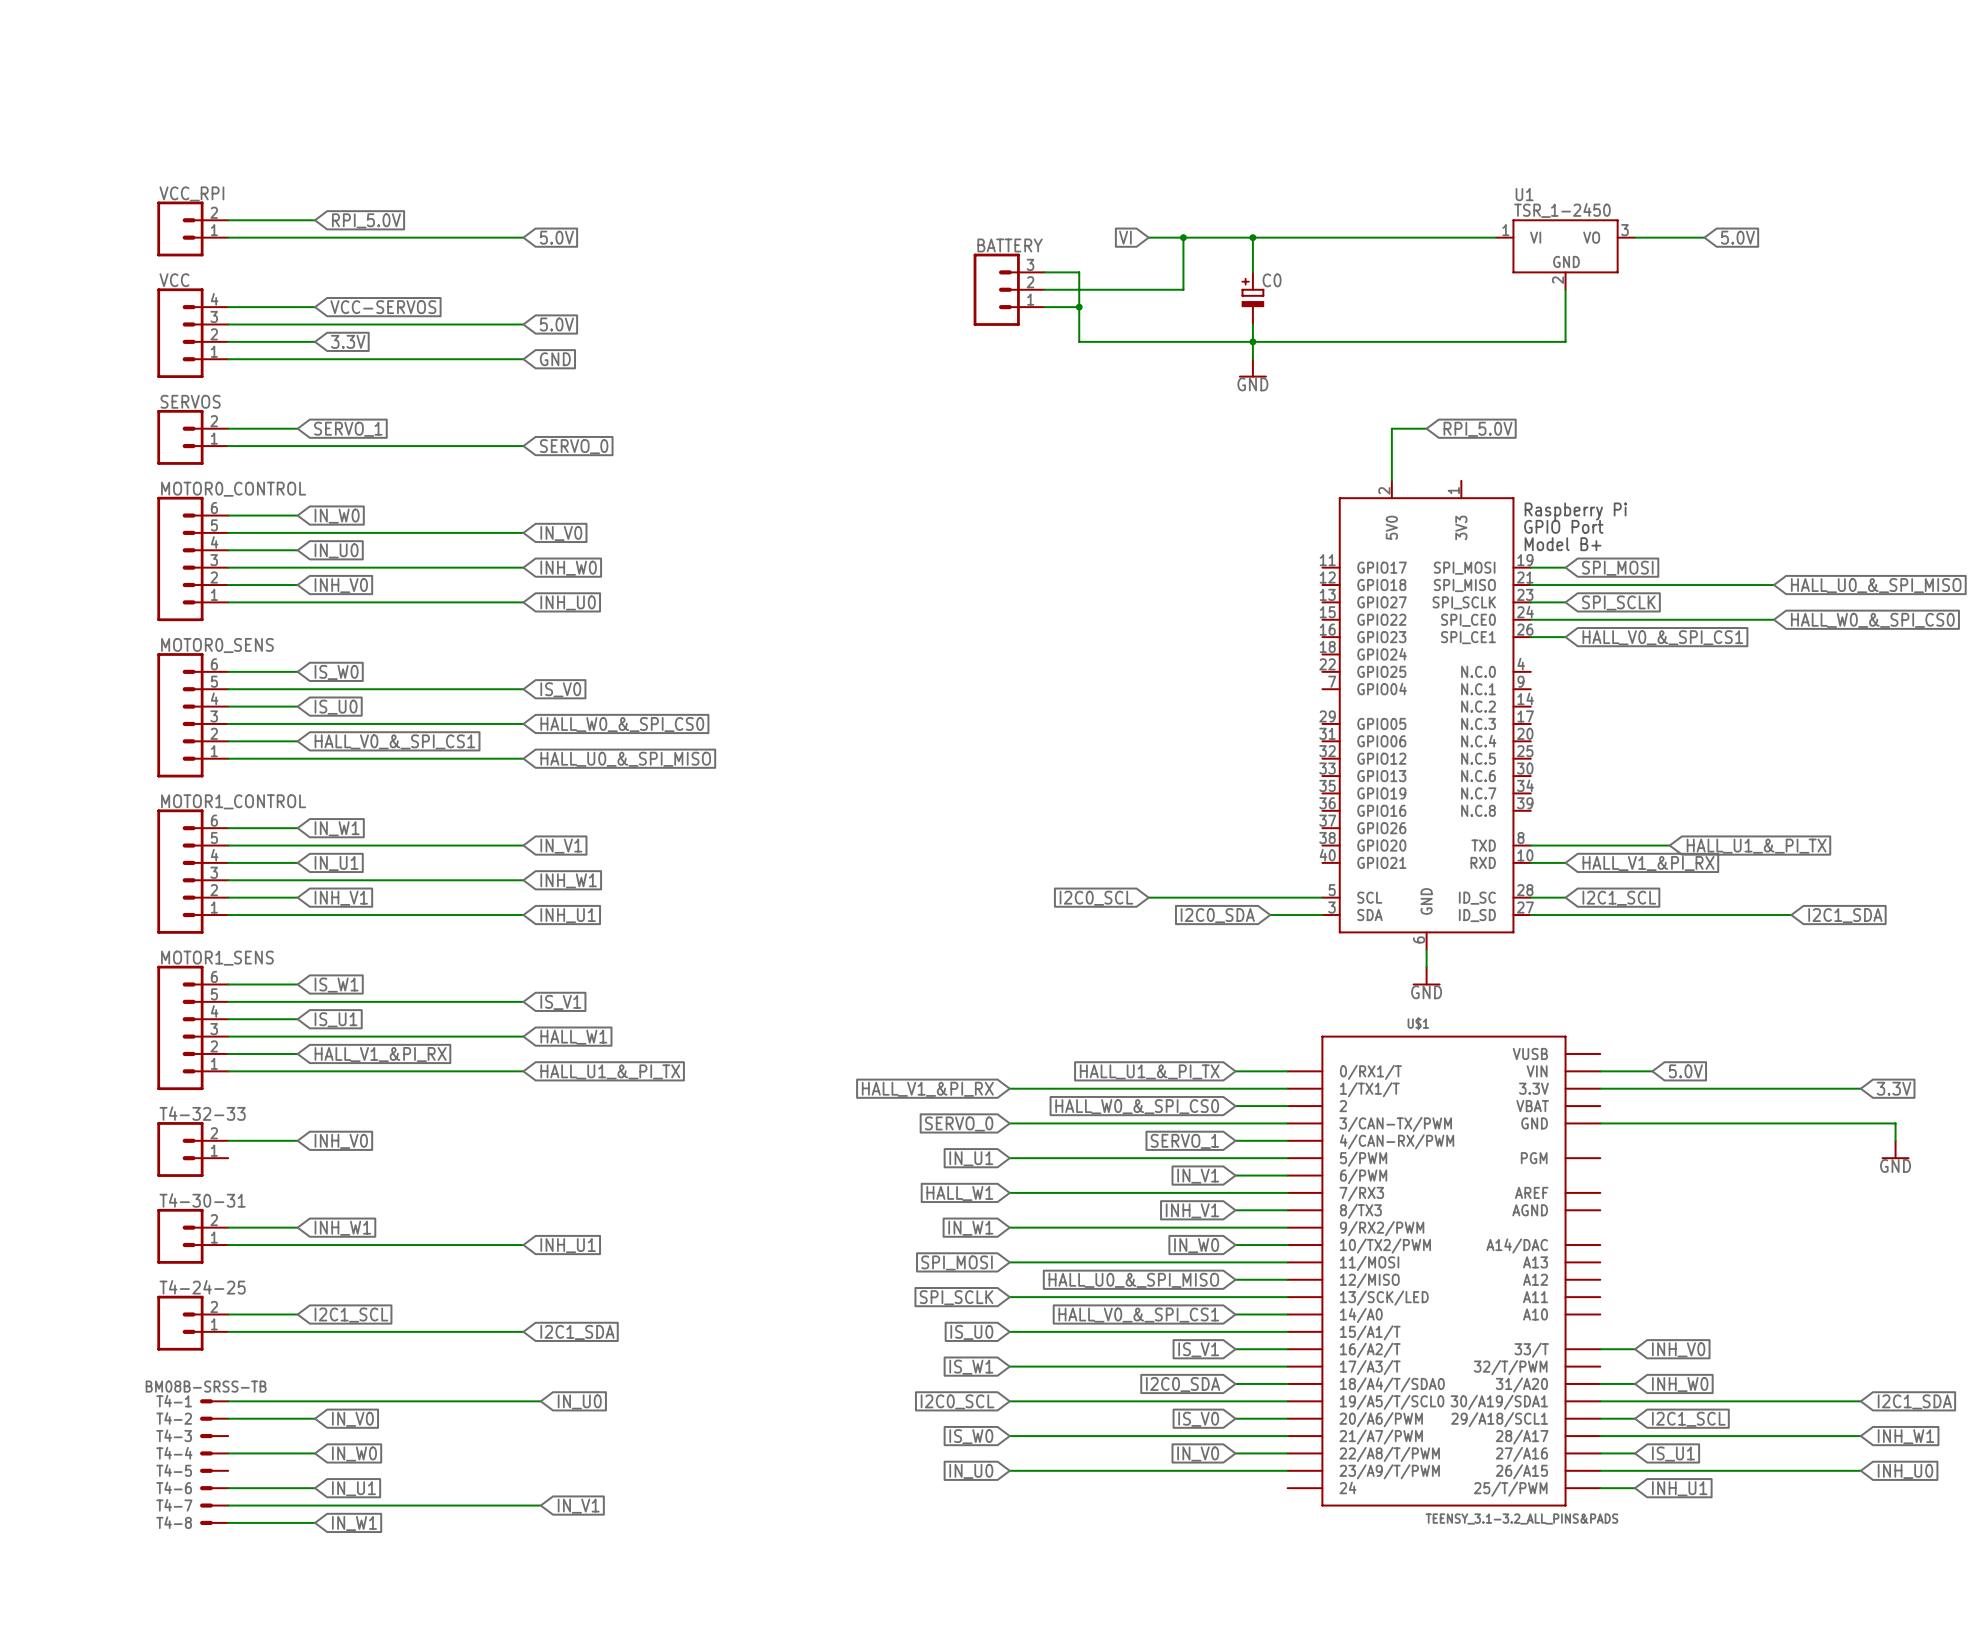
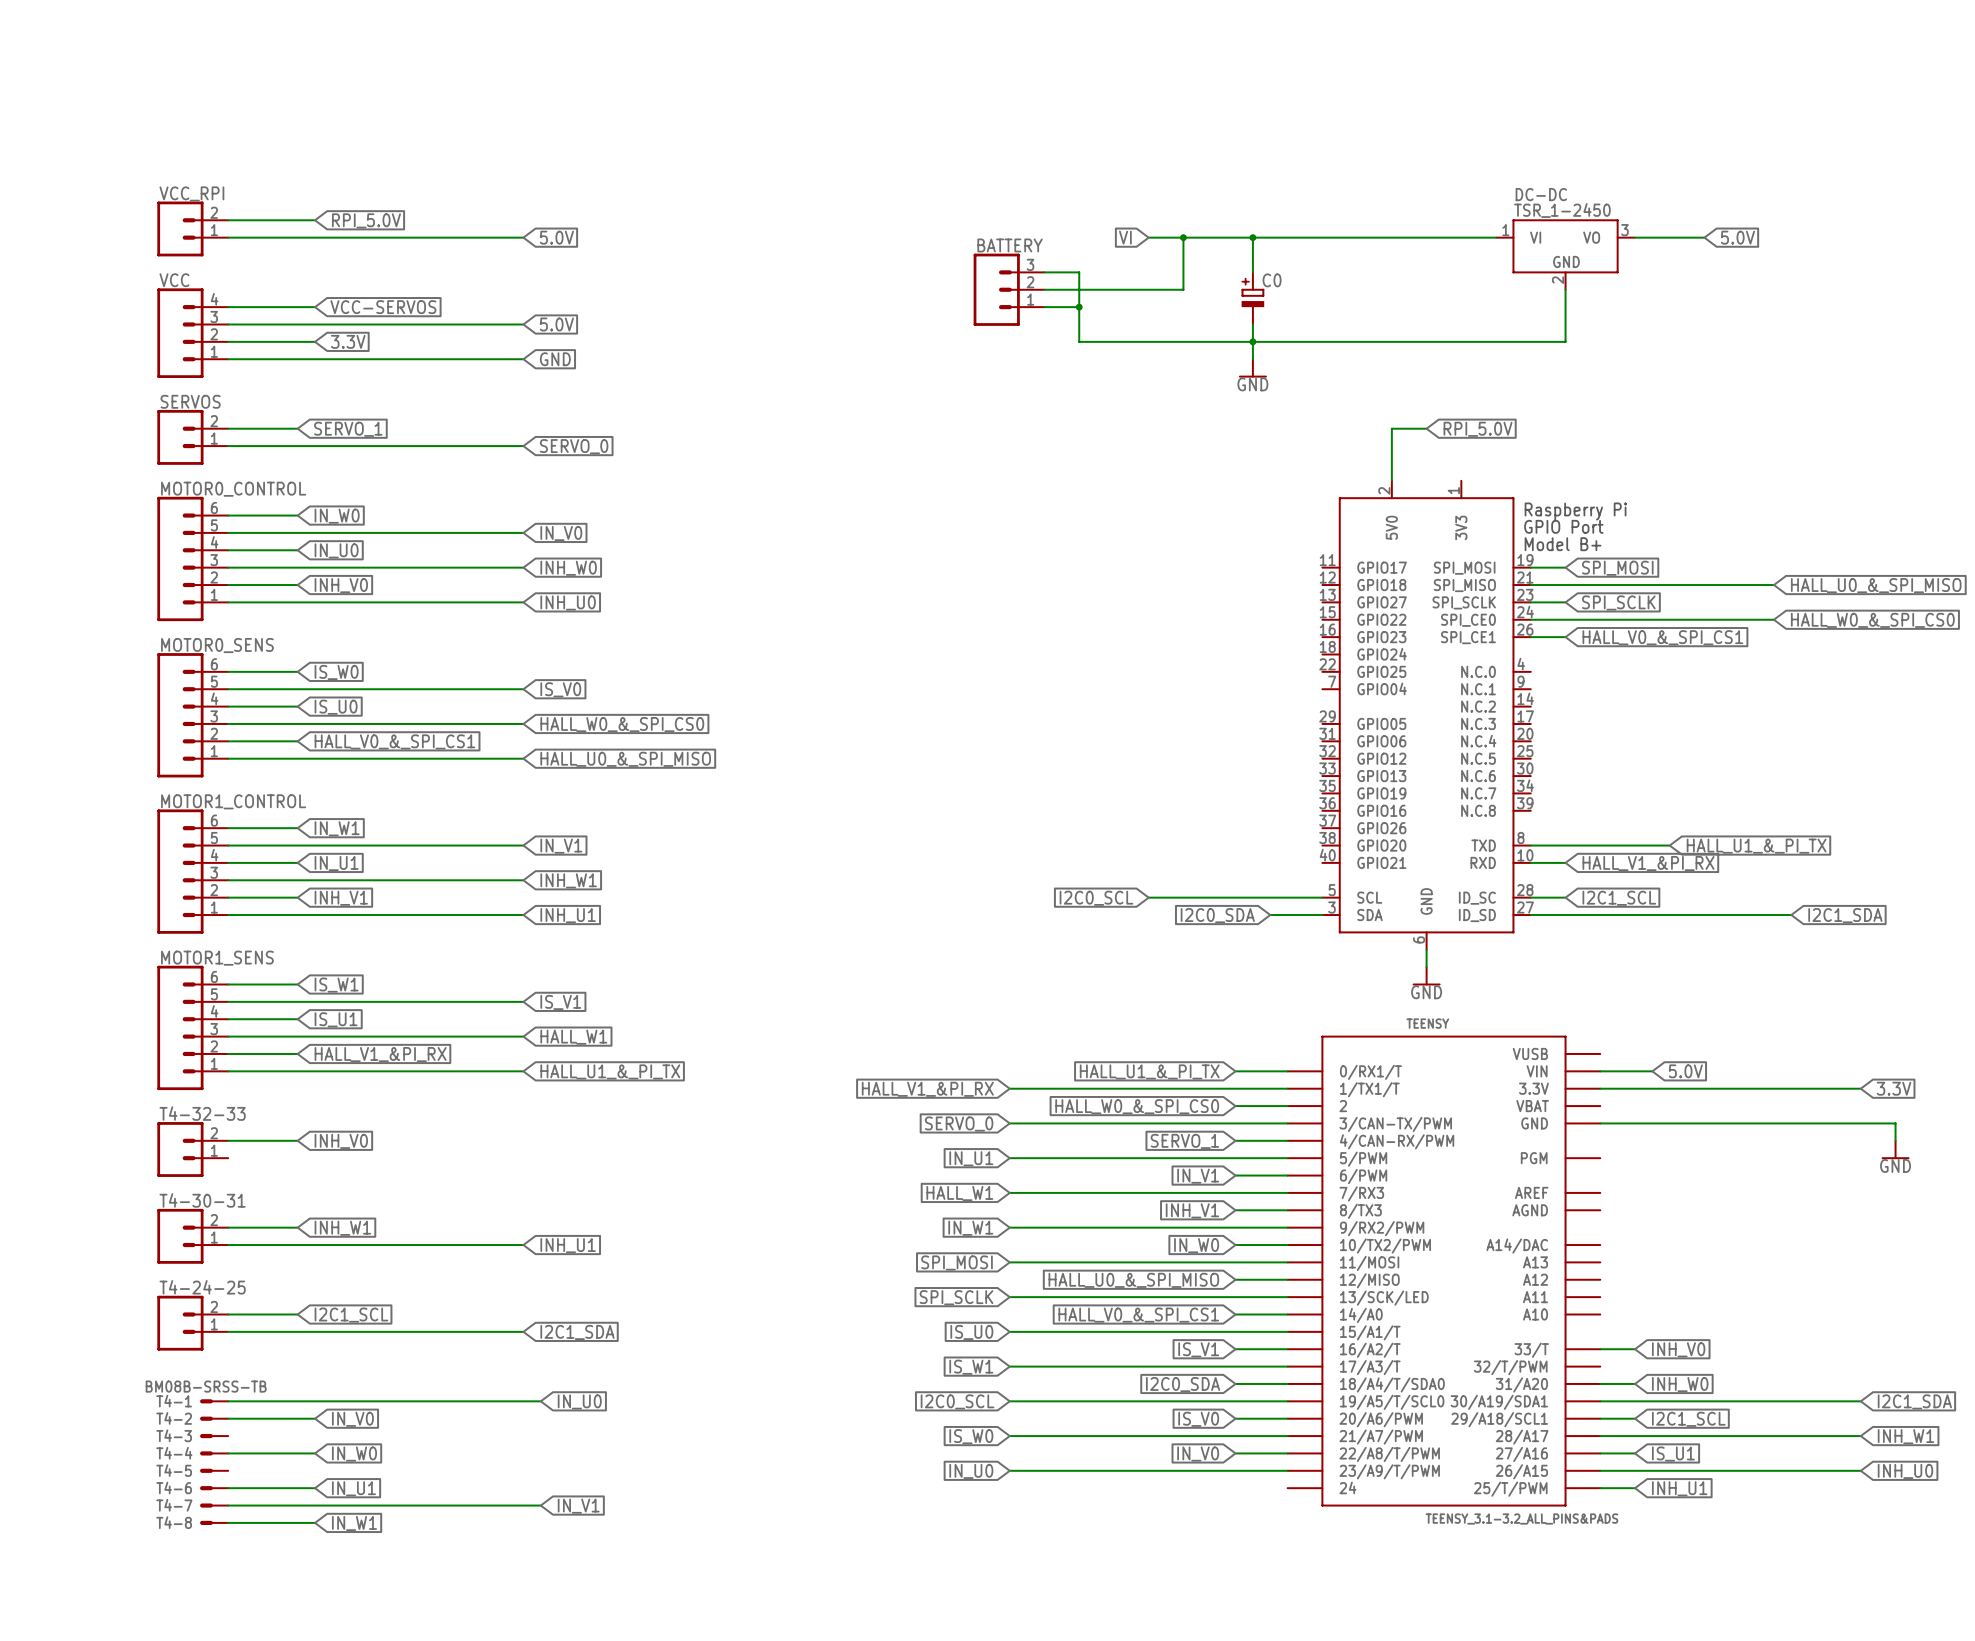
U1 name: U1 (1524, 194) -> DC-DC (1541, 194)
U$1 name: U$1 (1418, 1023) -> TEENSY (1427, 1023)

